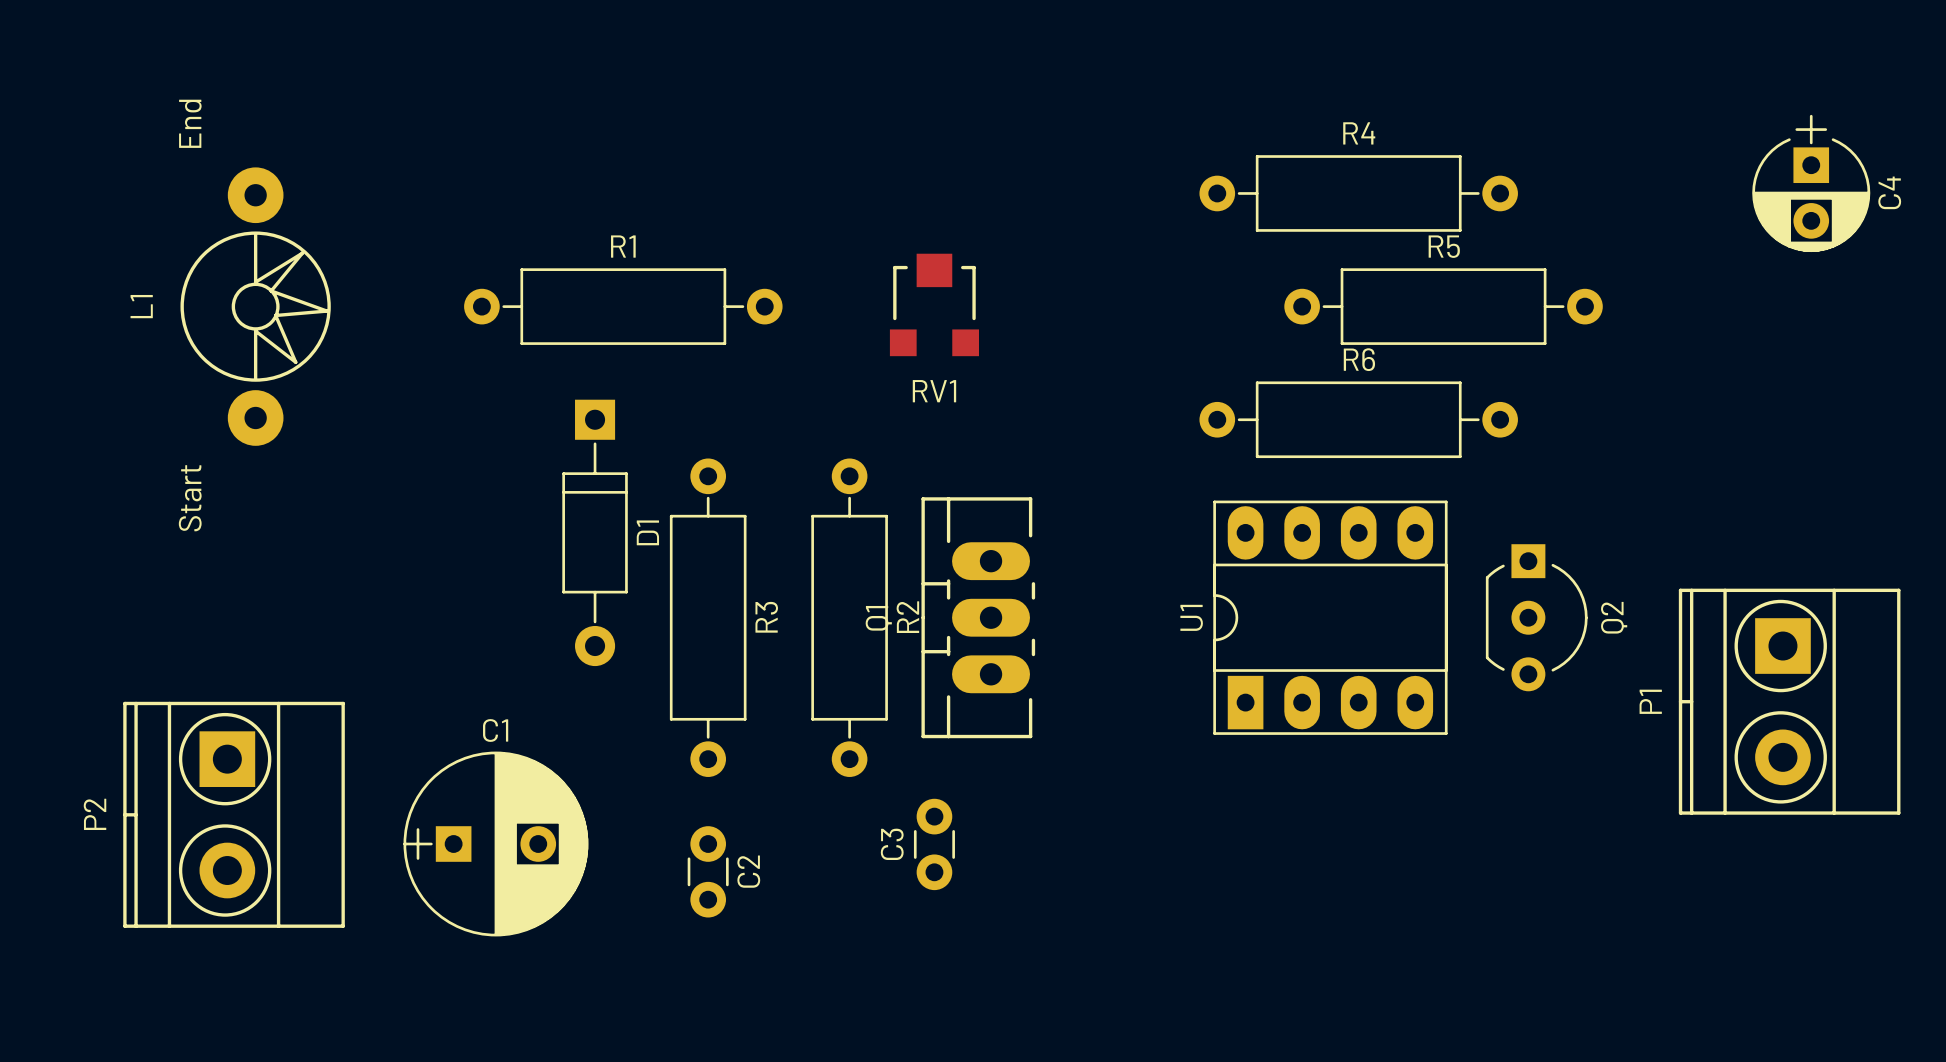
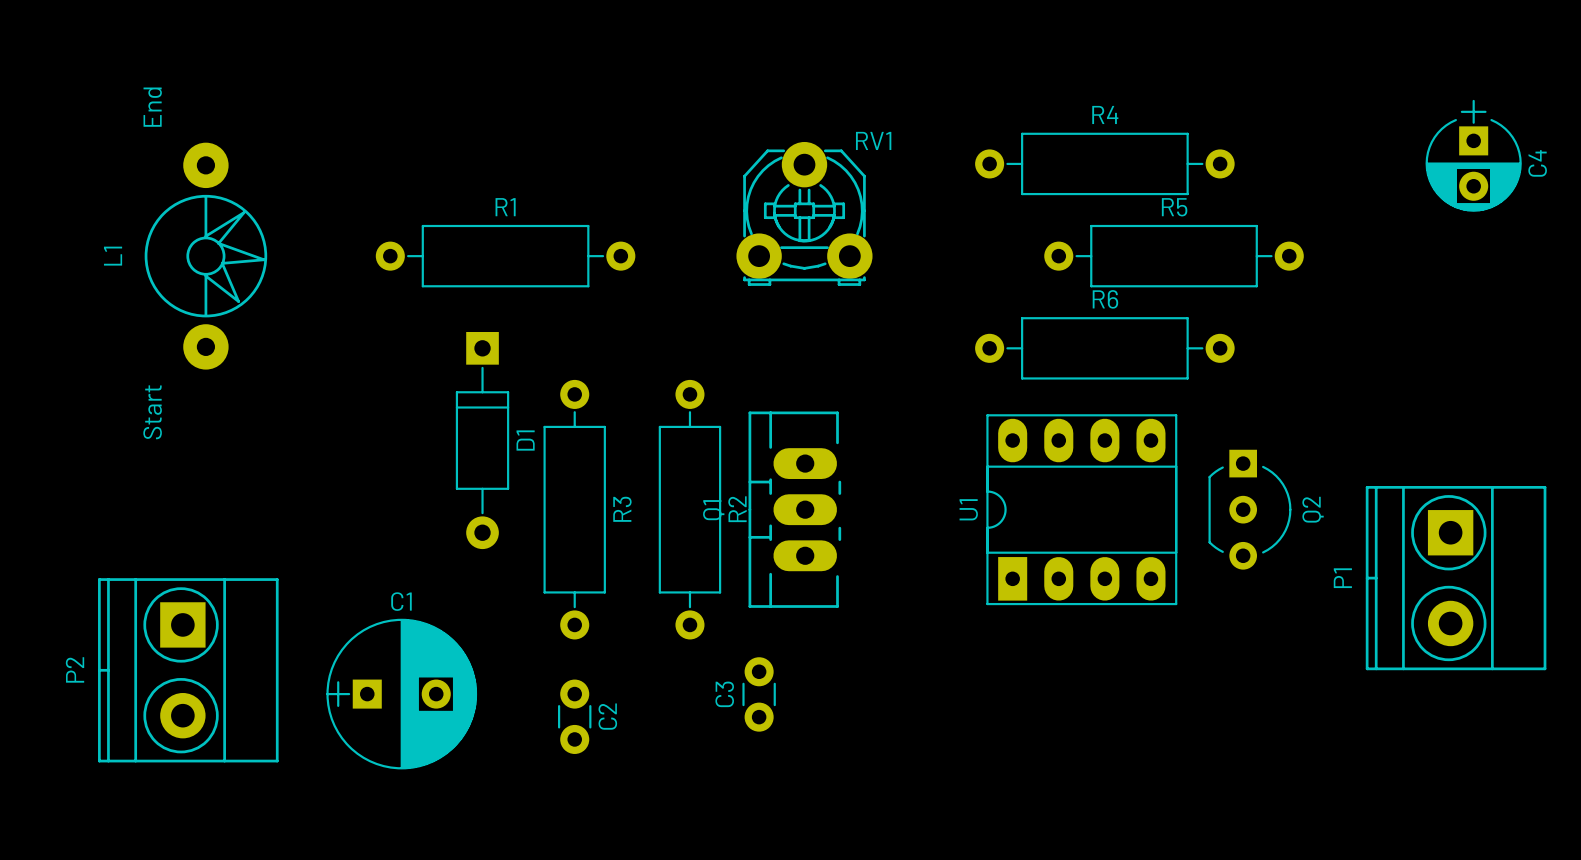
RV1 footprint: [889, 253, 979, 357] -> [736, 141, 873, 286]
RV1 name position: RV1 (934, 391) -> RV1 (873, 140)

